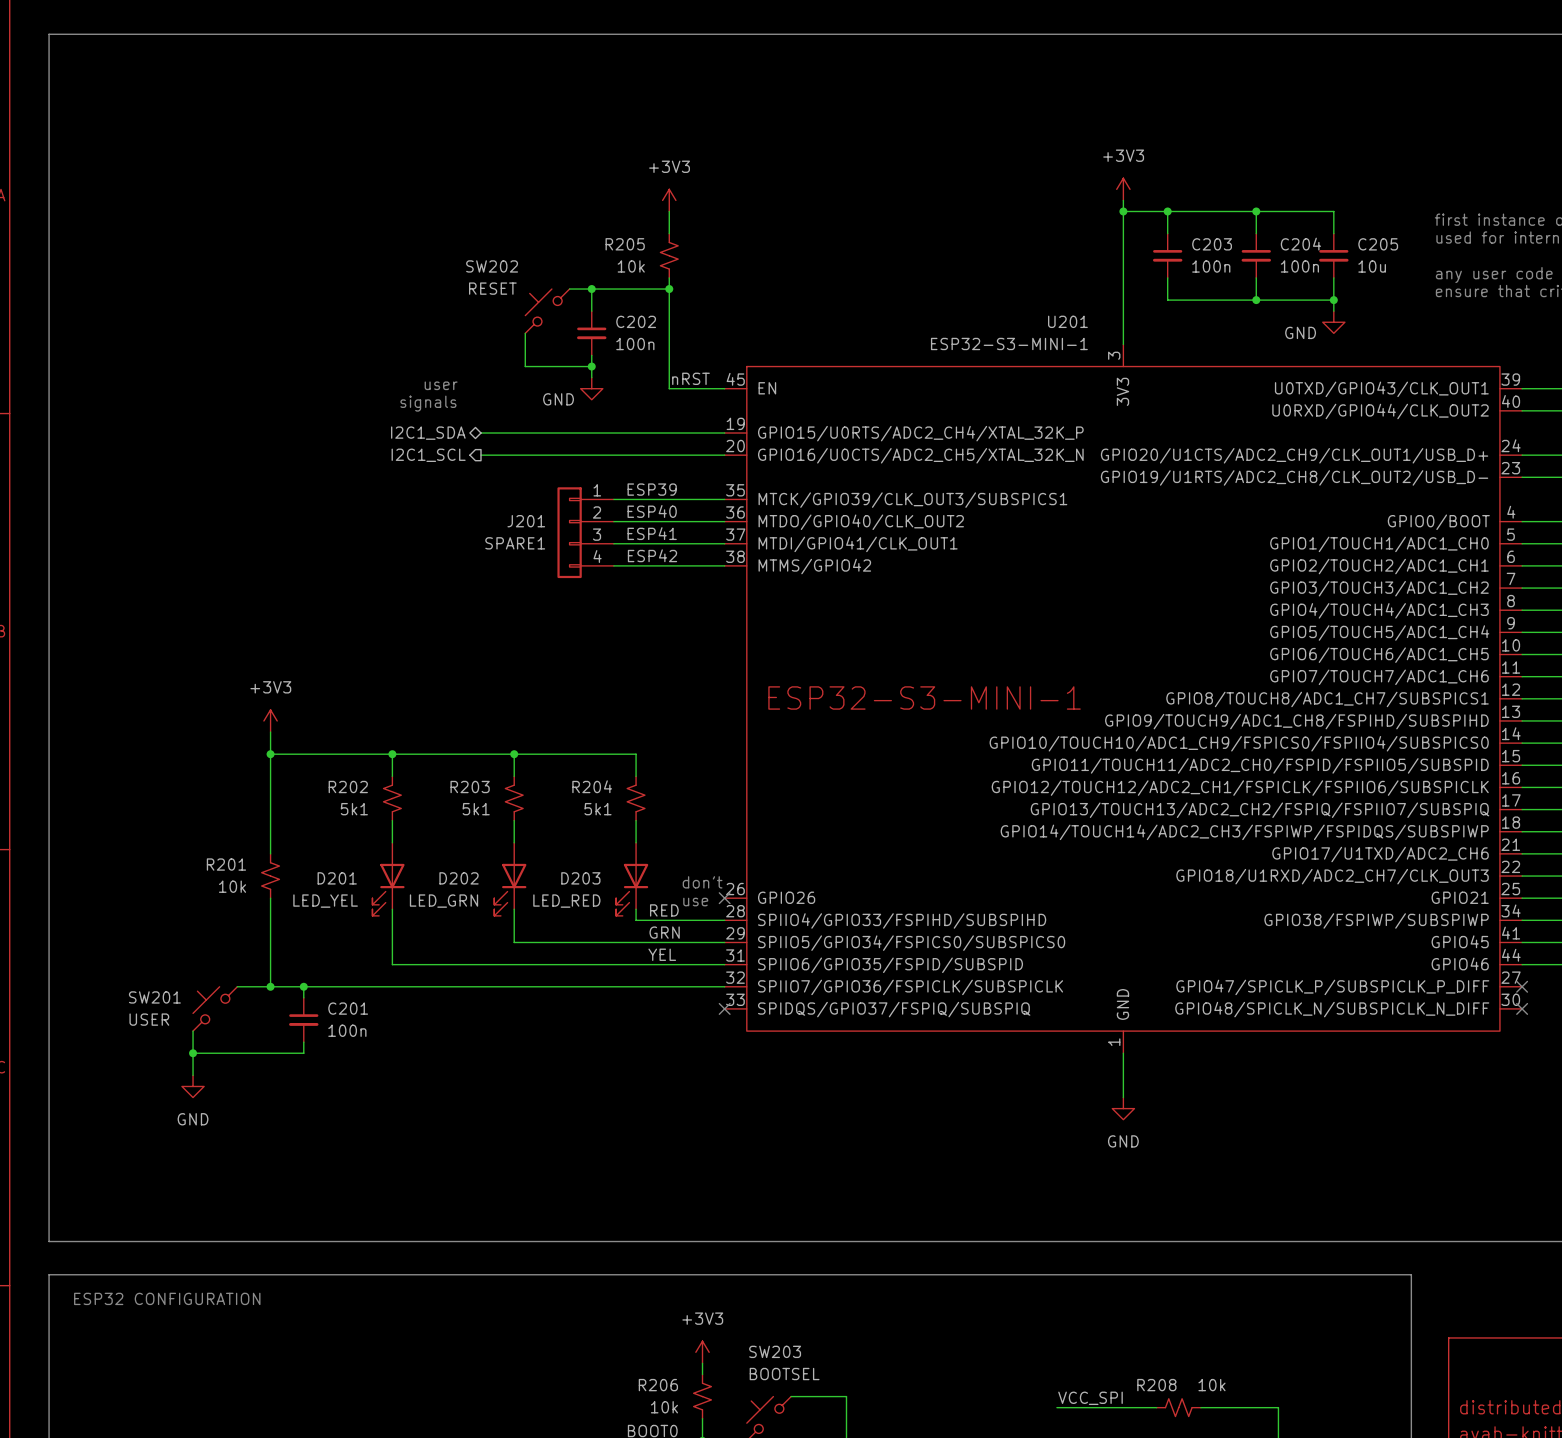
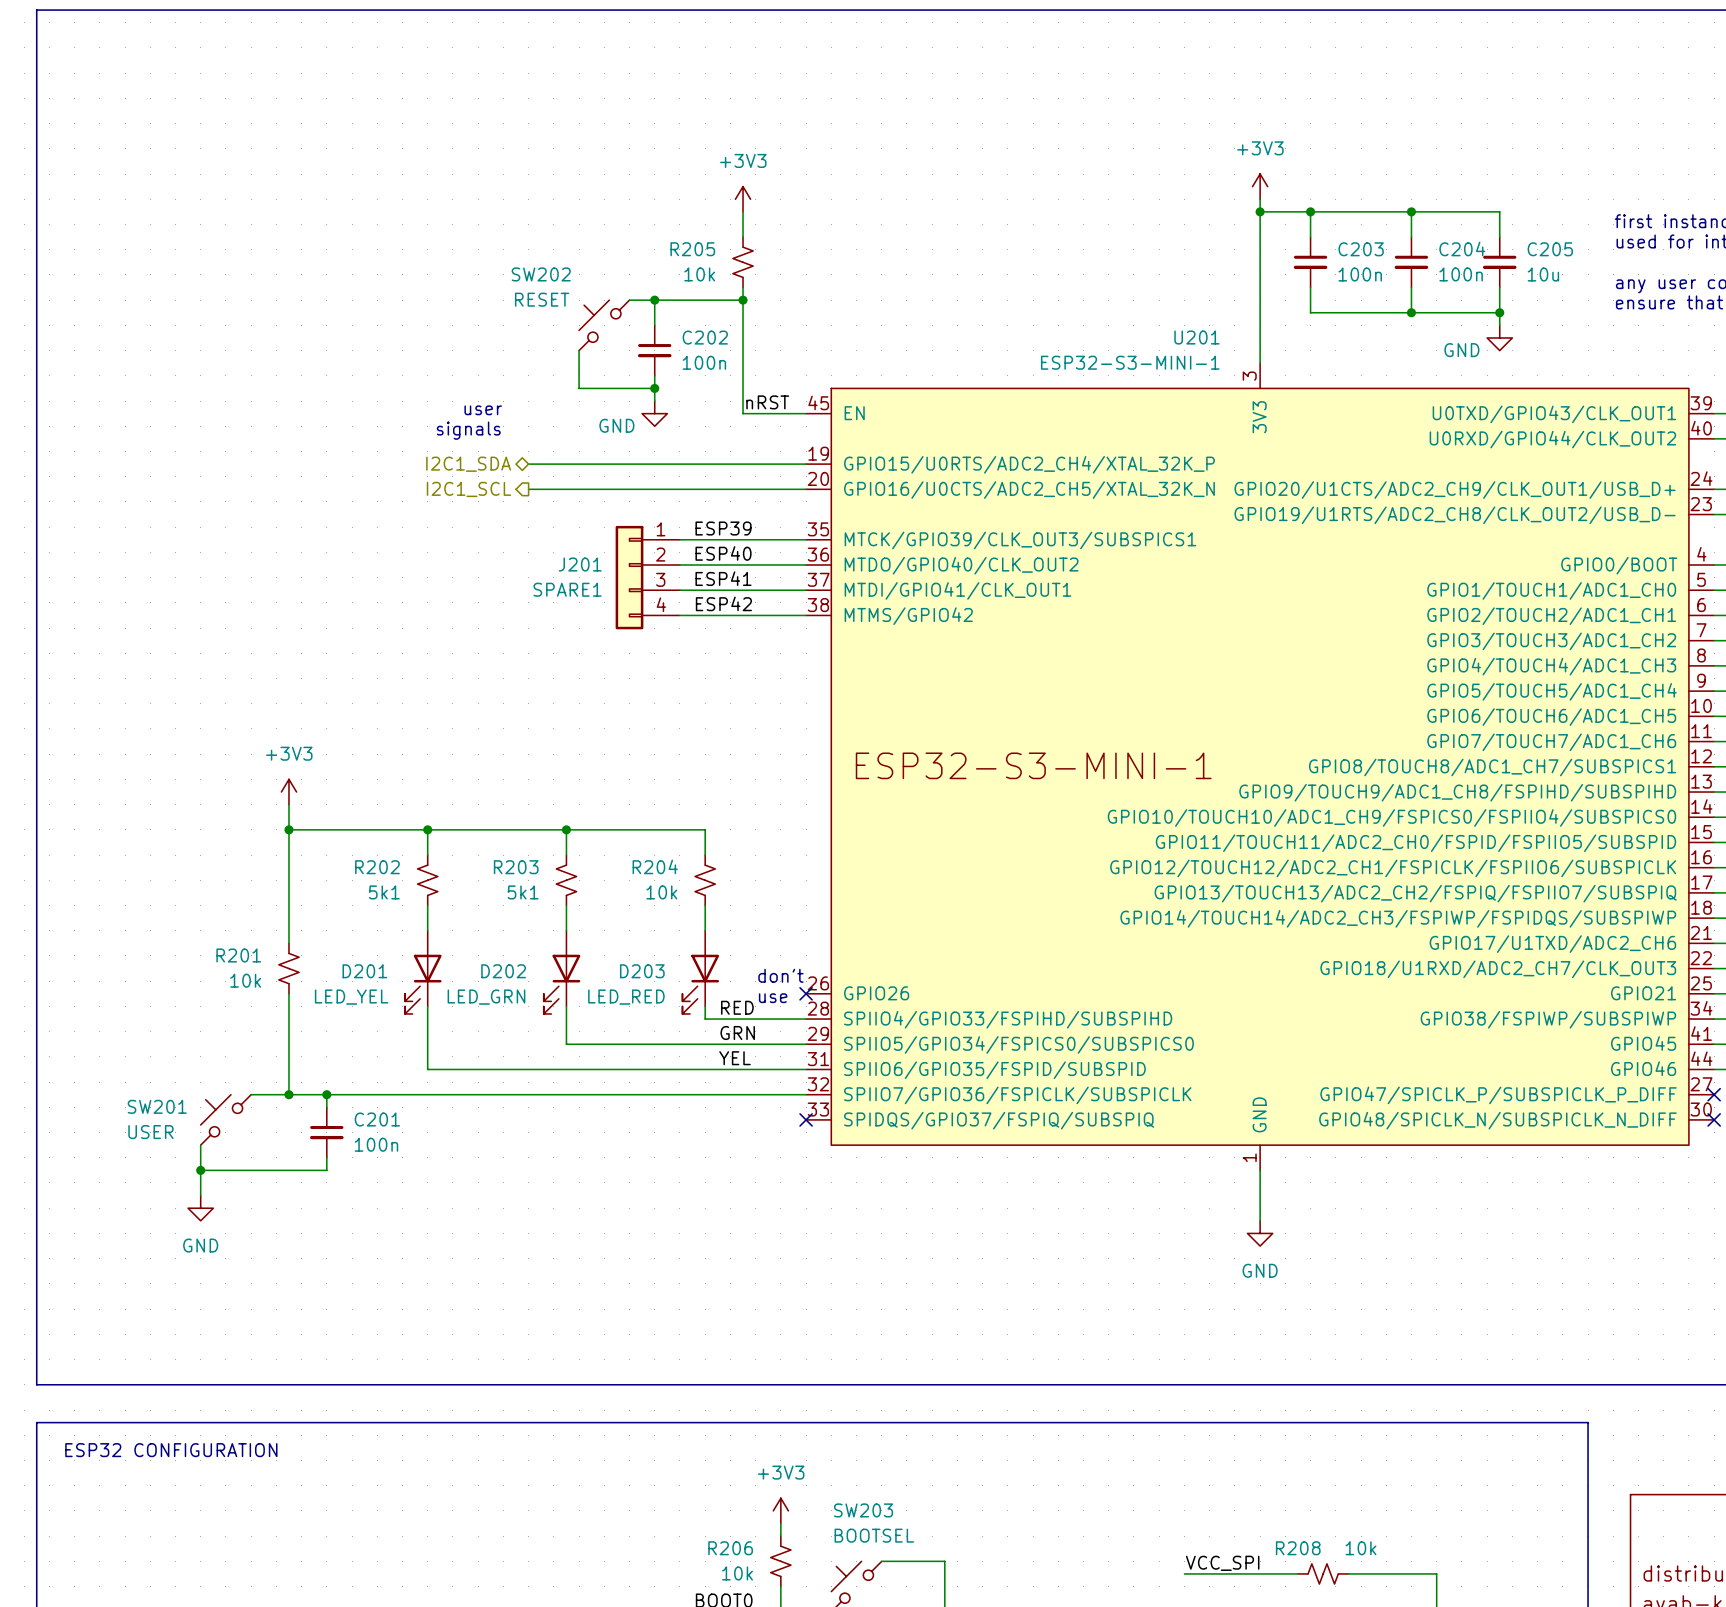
R204 flip: as is (636, 798) -> left-right (705, 880)
R204 value: 5k1 (598, 809) -> 10k (661, 892)

